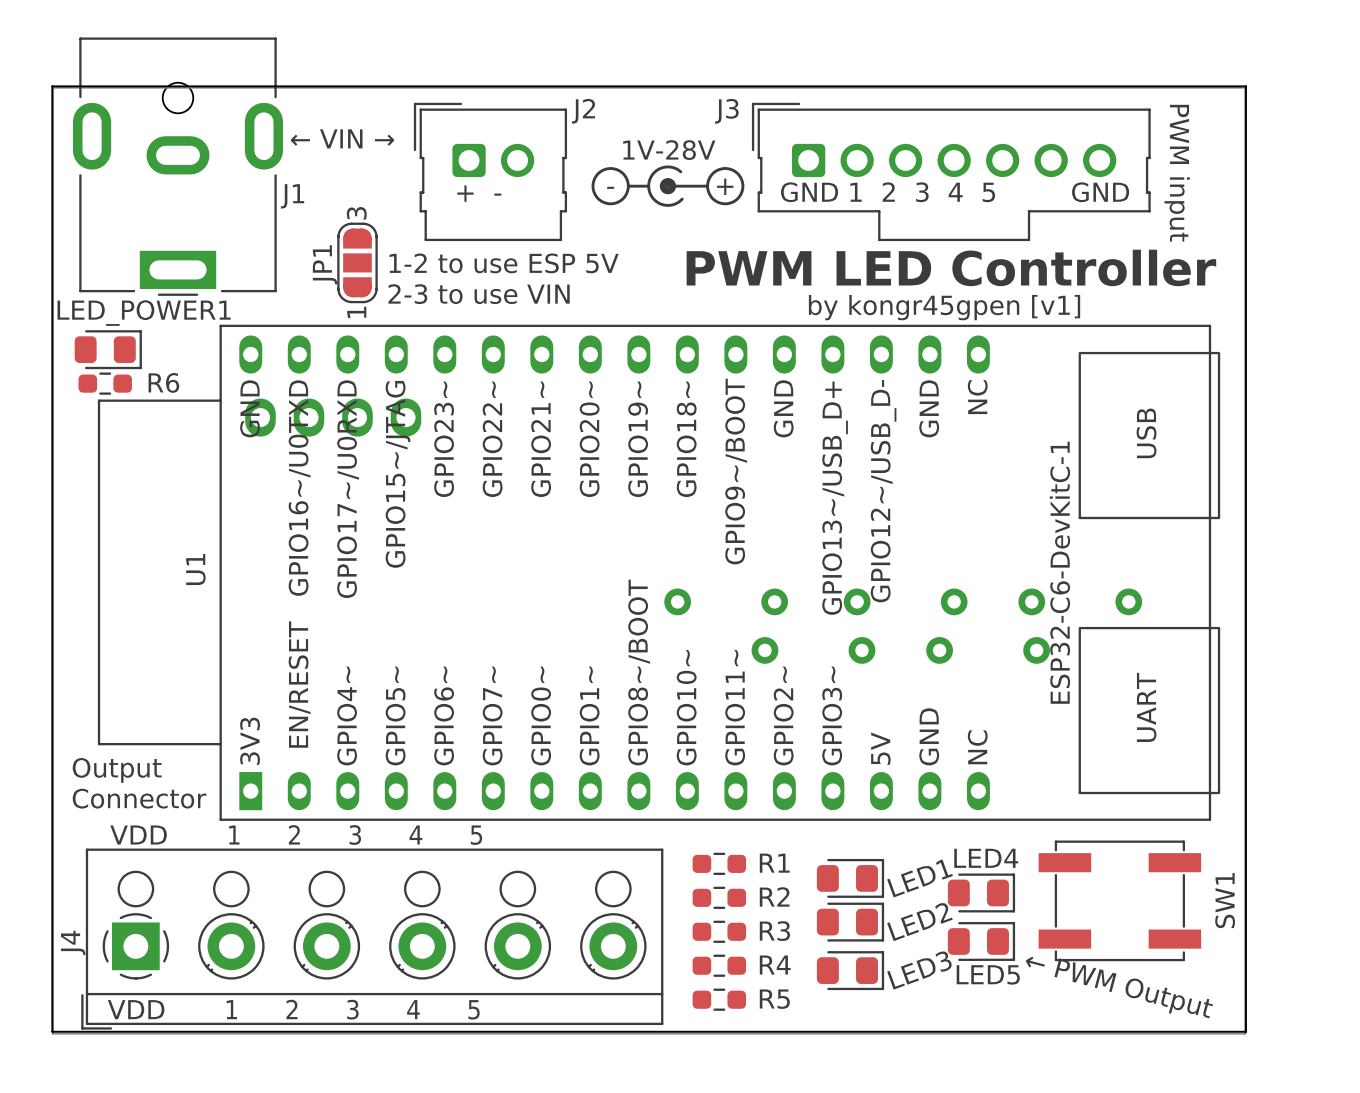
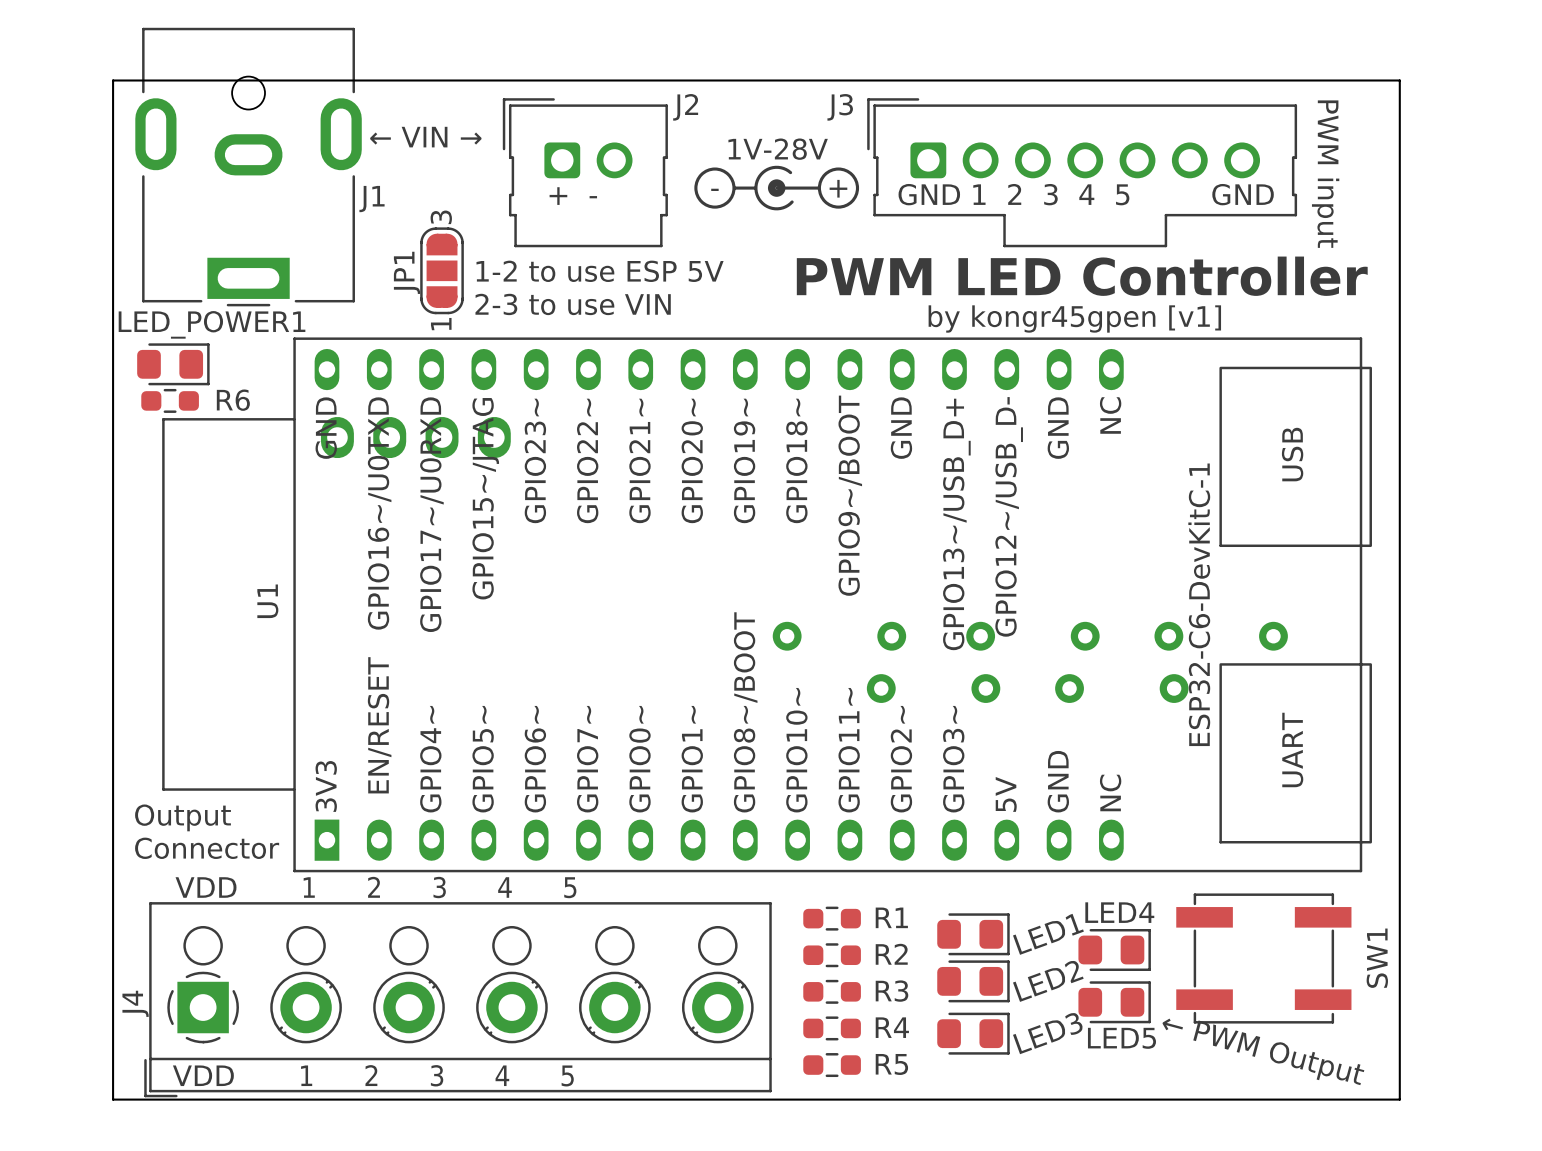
line: (52, 87) (1245, 87) (1245, 1033) (52, 1033) (52, 87) -> none

